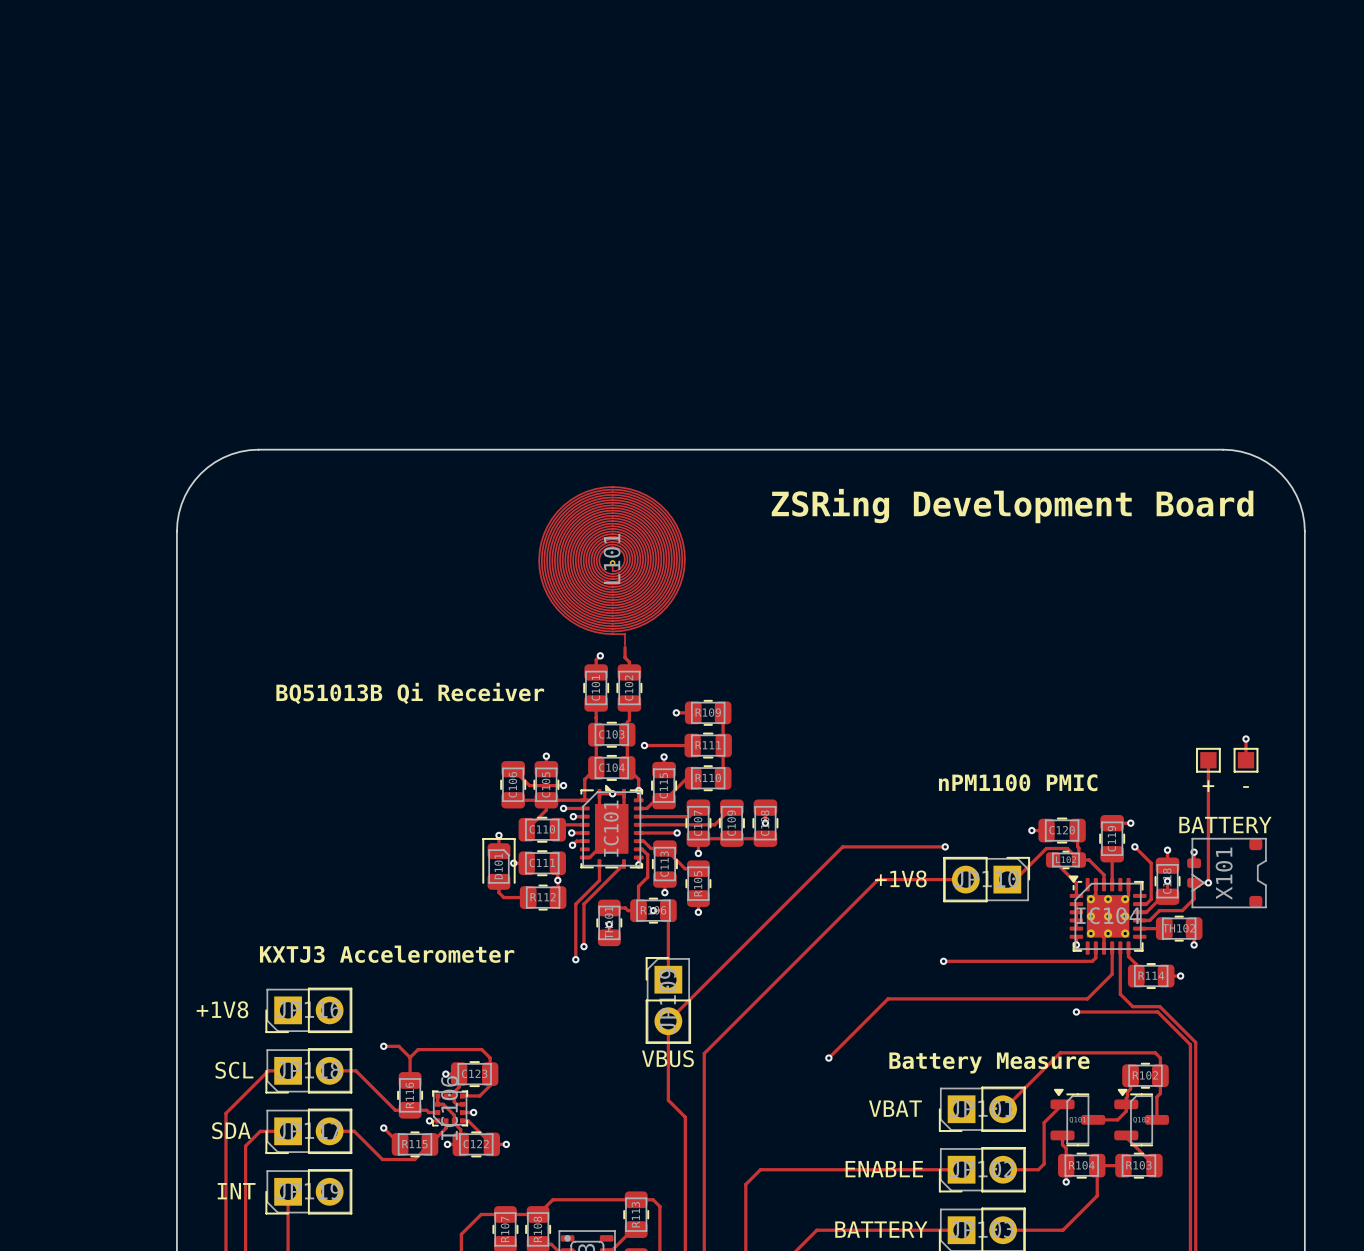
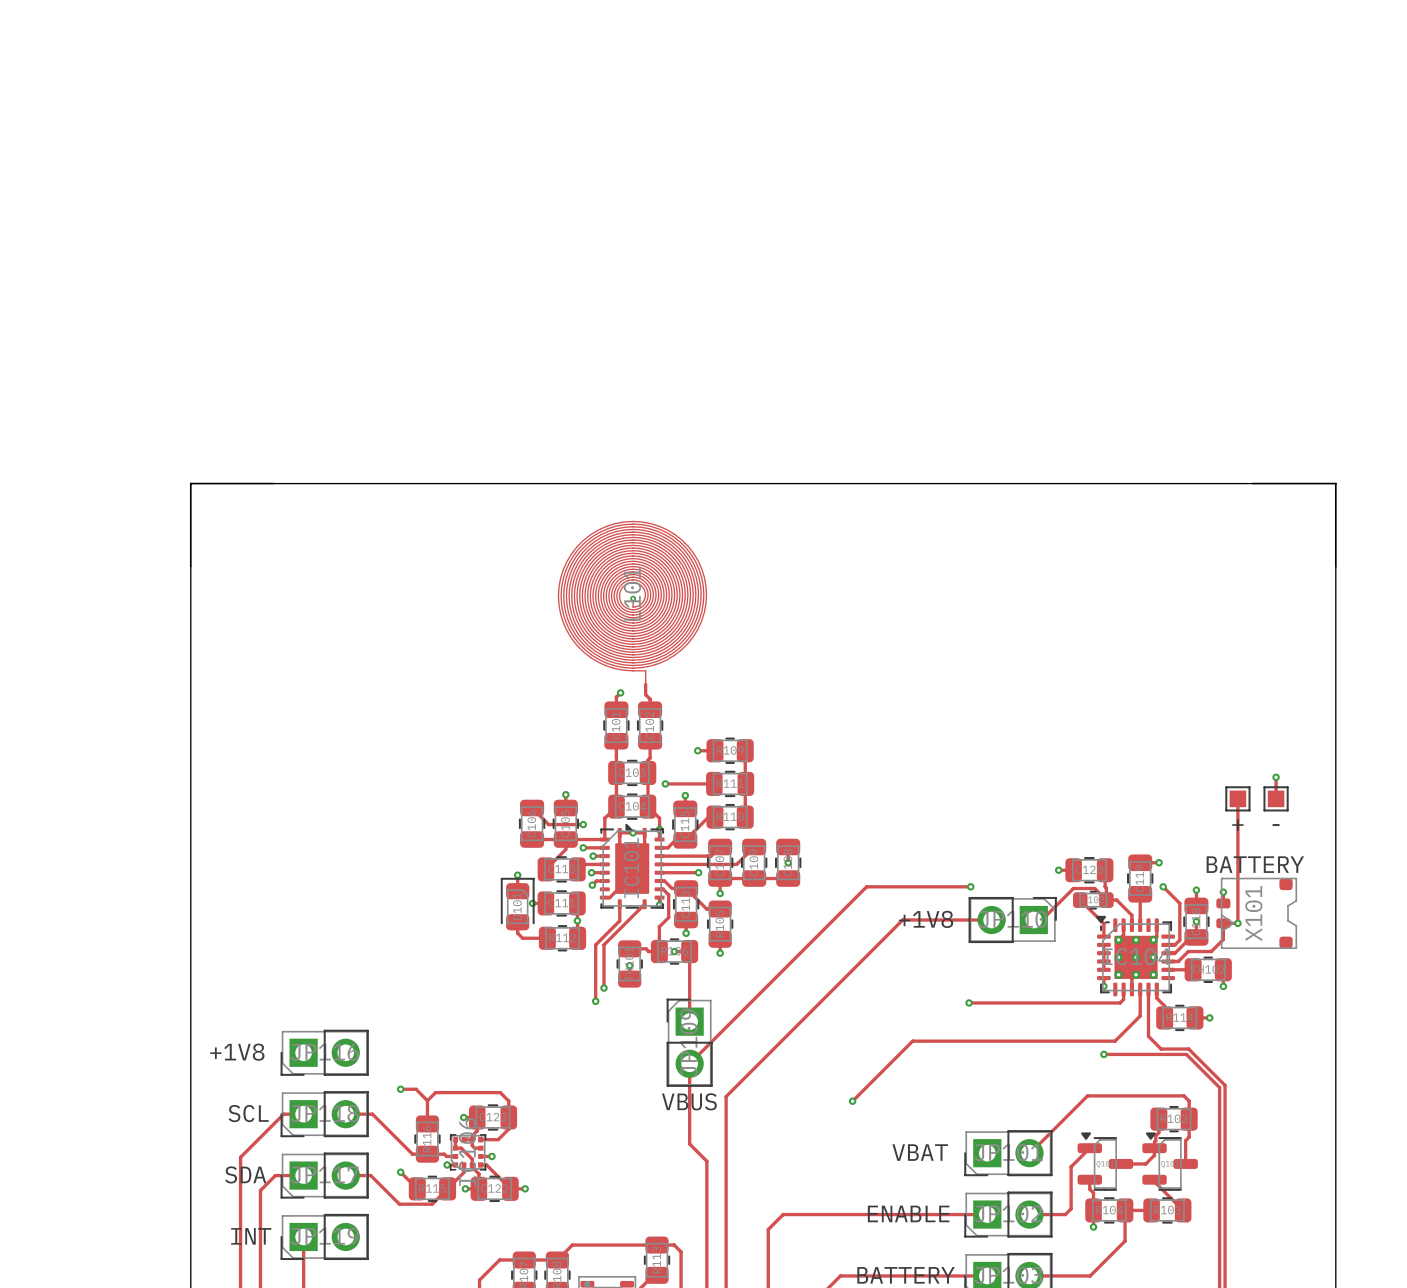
board edge: (258, 449) (231, 454) (215, 462) (200, 473) (189, 487) (181, 504) (176, 531) -> (273, 483) (190, 483) (190, 566)
board edge: (1223, 449) (1241, 451) (1258, 457) (1280, 473) (1292, 487) (1300, 504) (1304, 531) -> (1252, 483) (1335, 483) (1335, 566)
text: ZSRing Development Board (1012, 506) -> none
text: BQ51013B Qi Receiver (410, 693) -> none
text: nPM1100 PMIC (1018, 782) -> none
text: KXTJ3 Accelerometer (387, 954) -> none
text: Battery Measure (989, 1062) -> none

